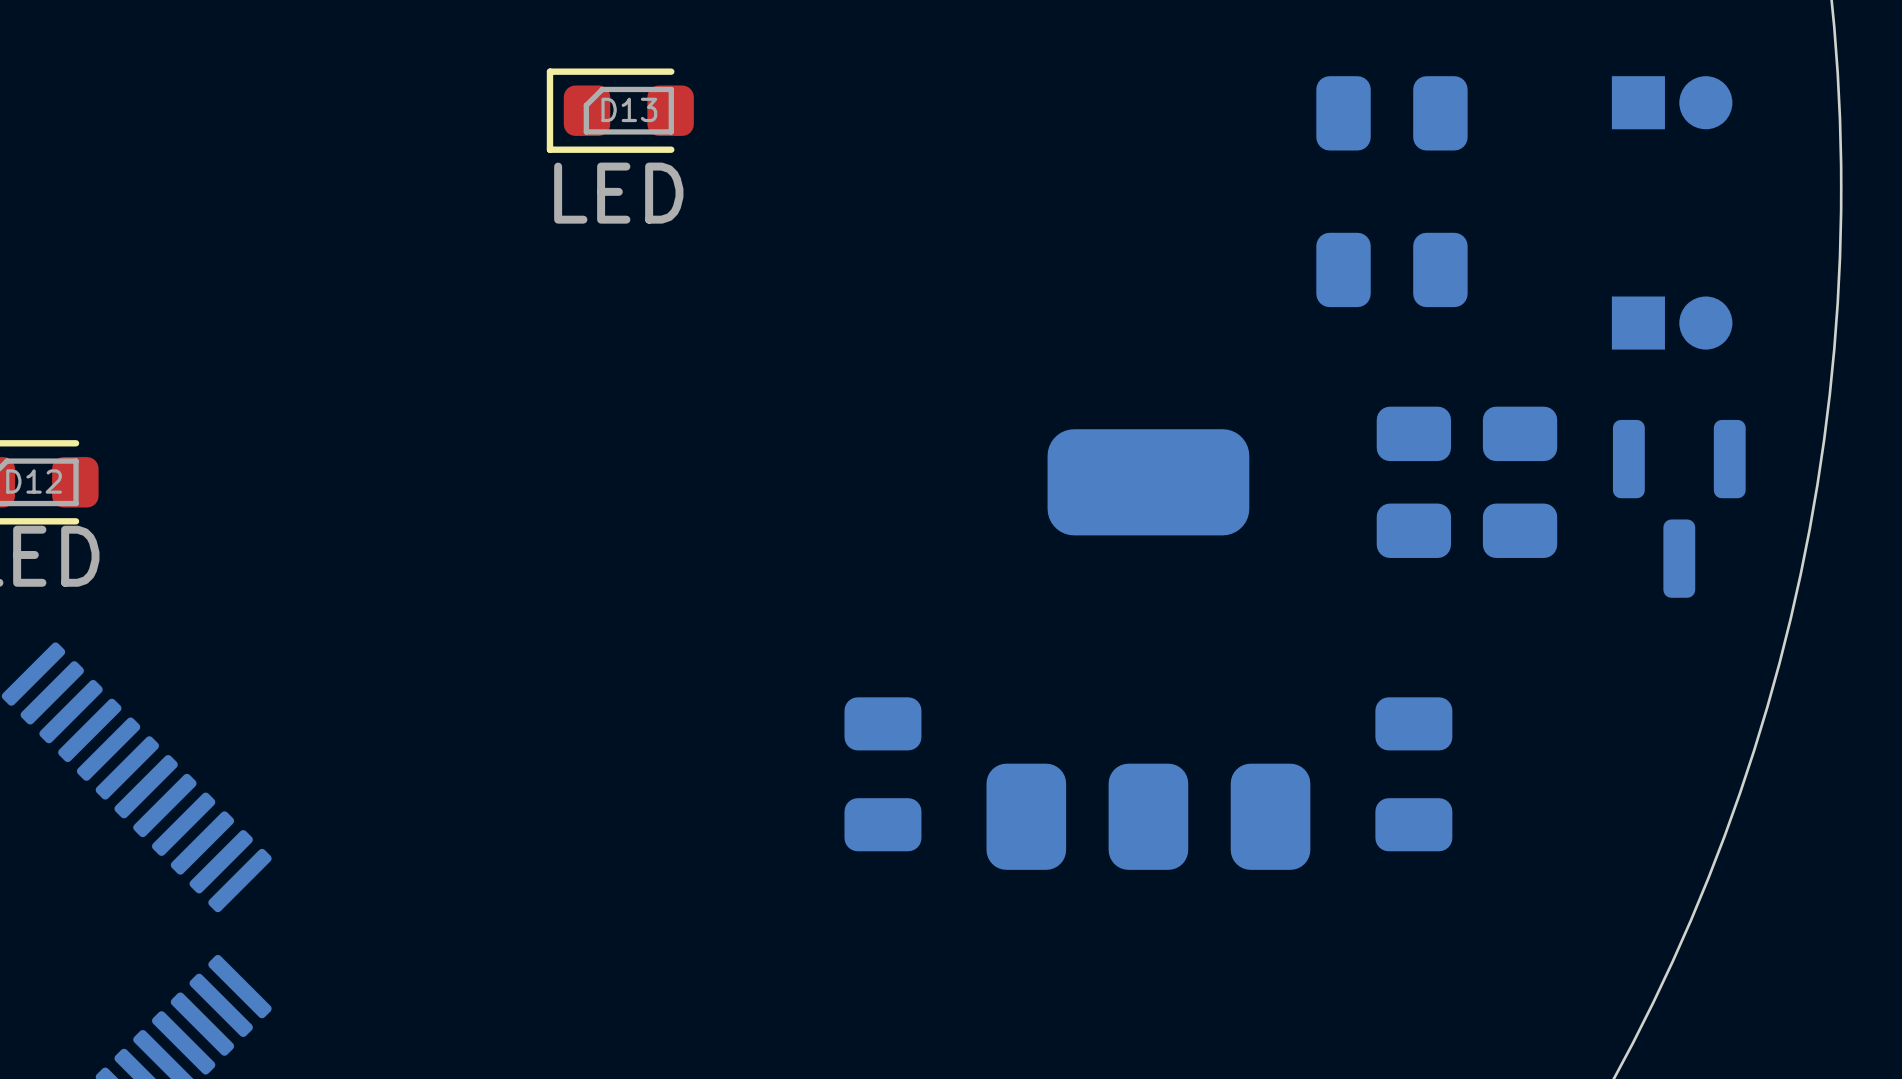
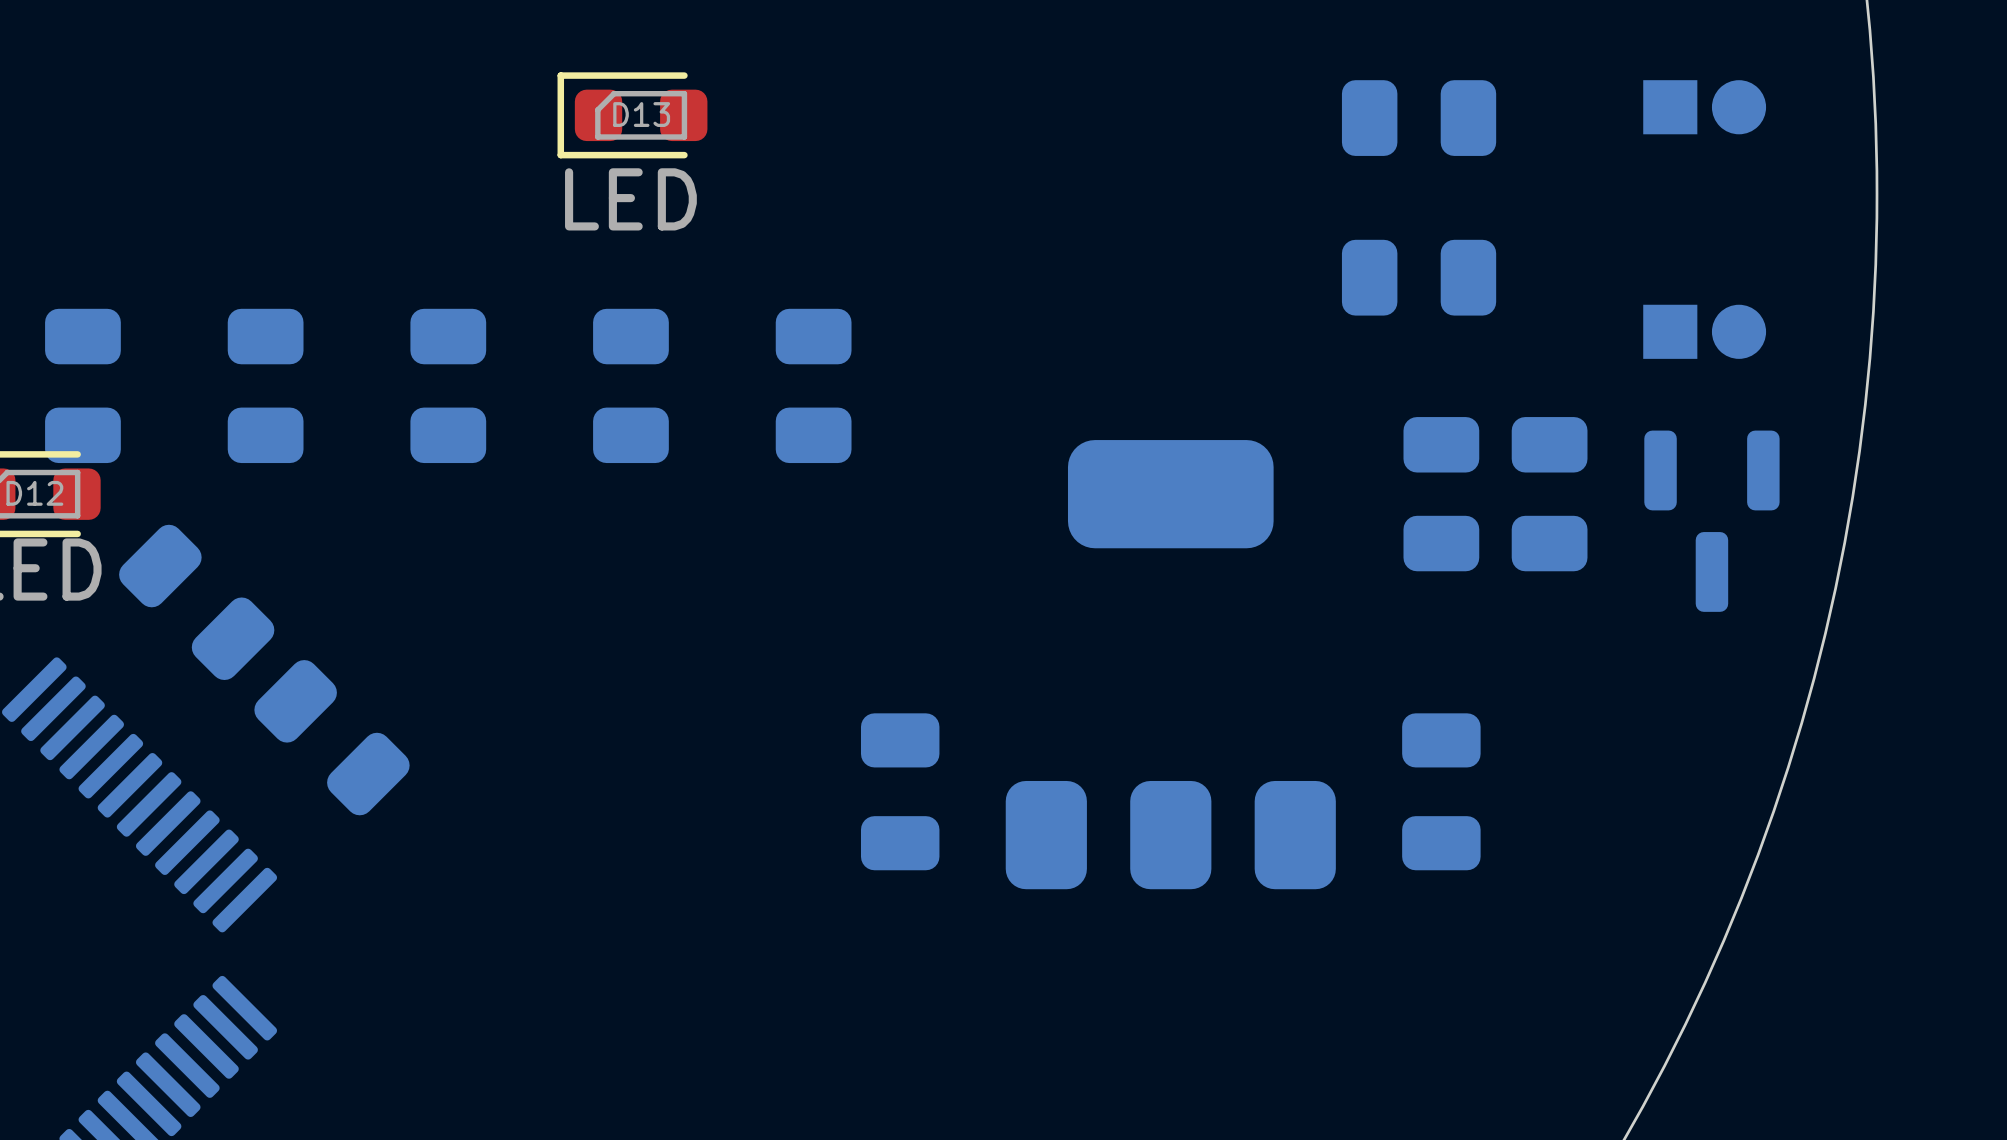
part: none -> (82, 385)
part: none -> (265, 385)
part: none -> (448, 385)
part: none -> (630, 385)
part: none -> (813, 385)
part: none -> (196, 602)
part: none -> (332, 737)

